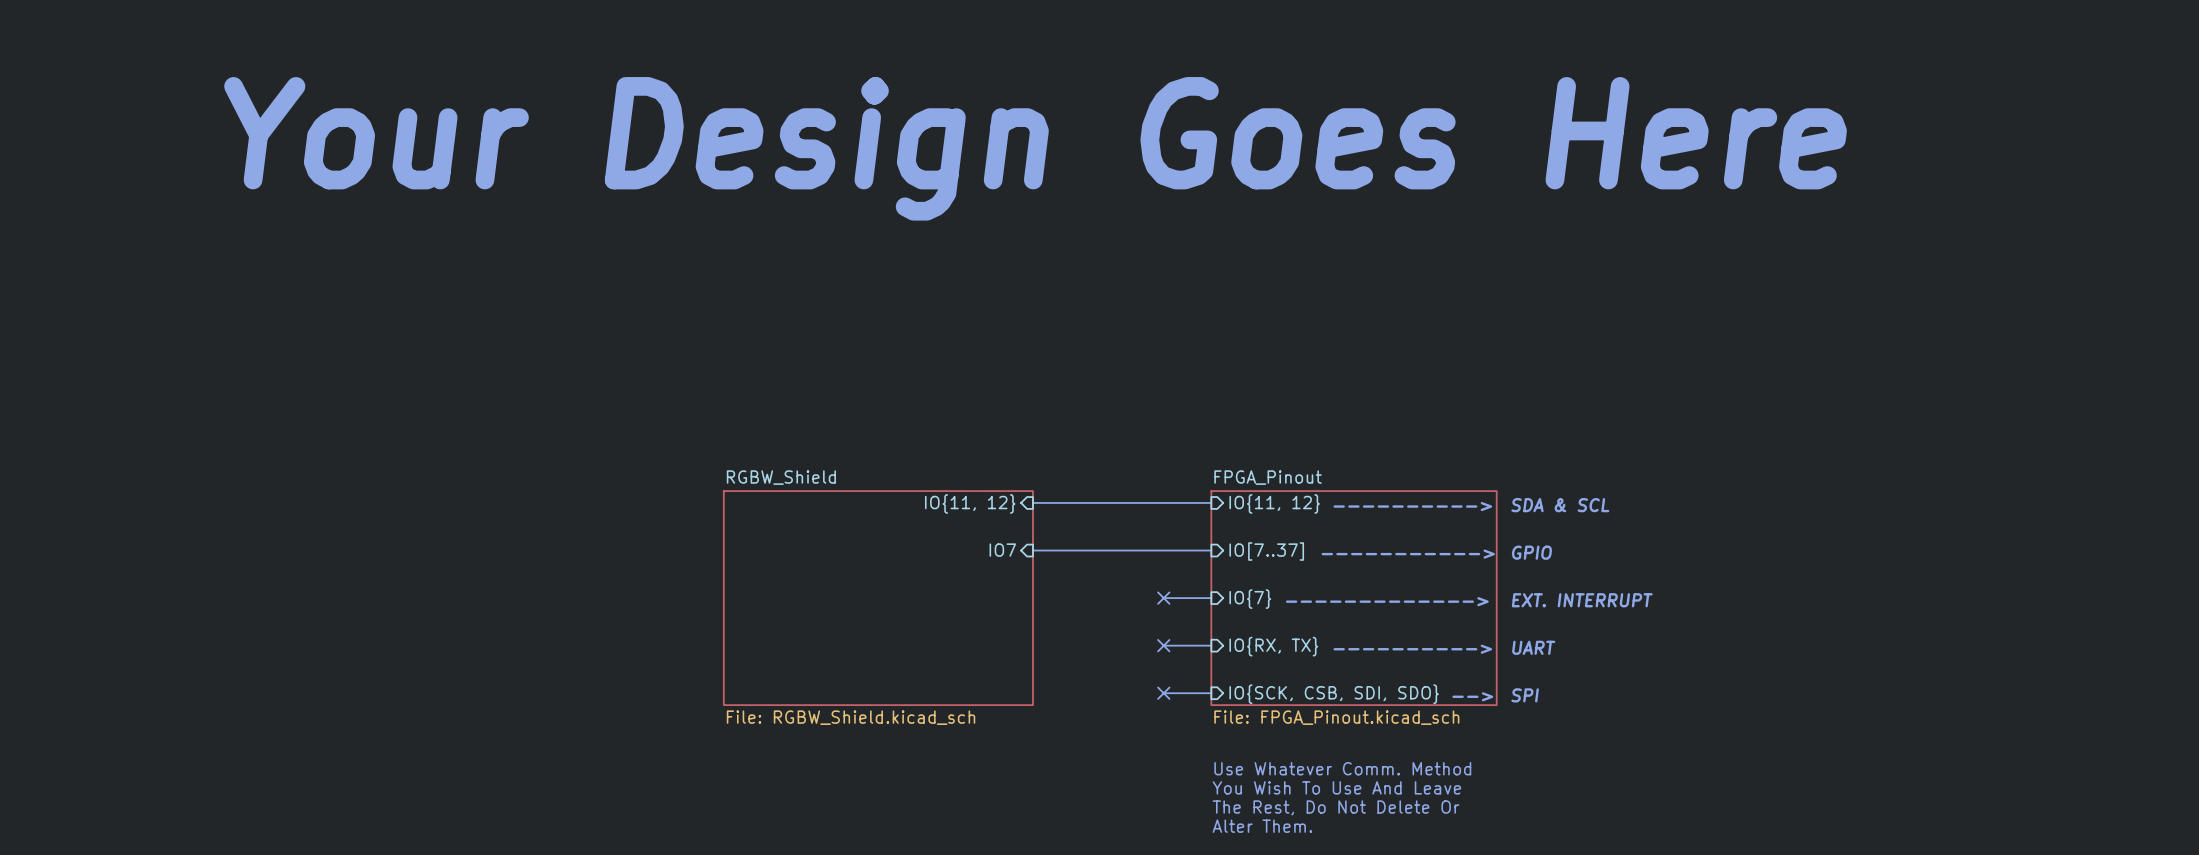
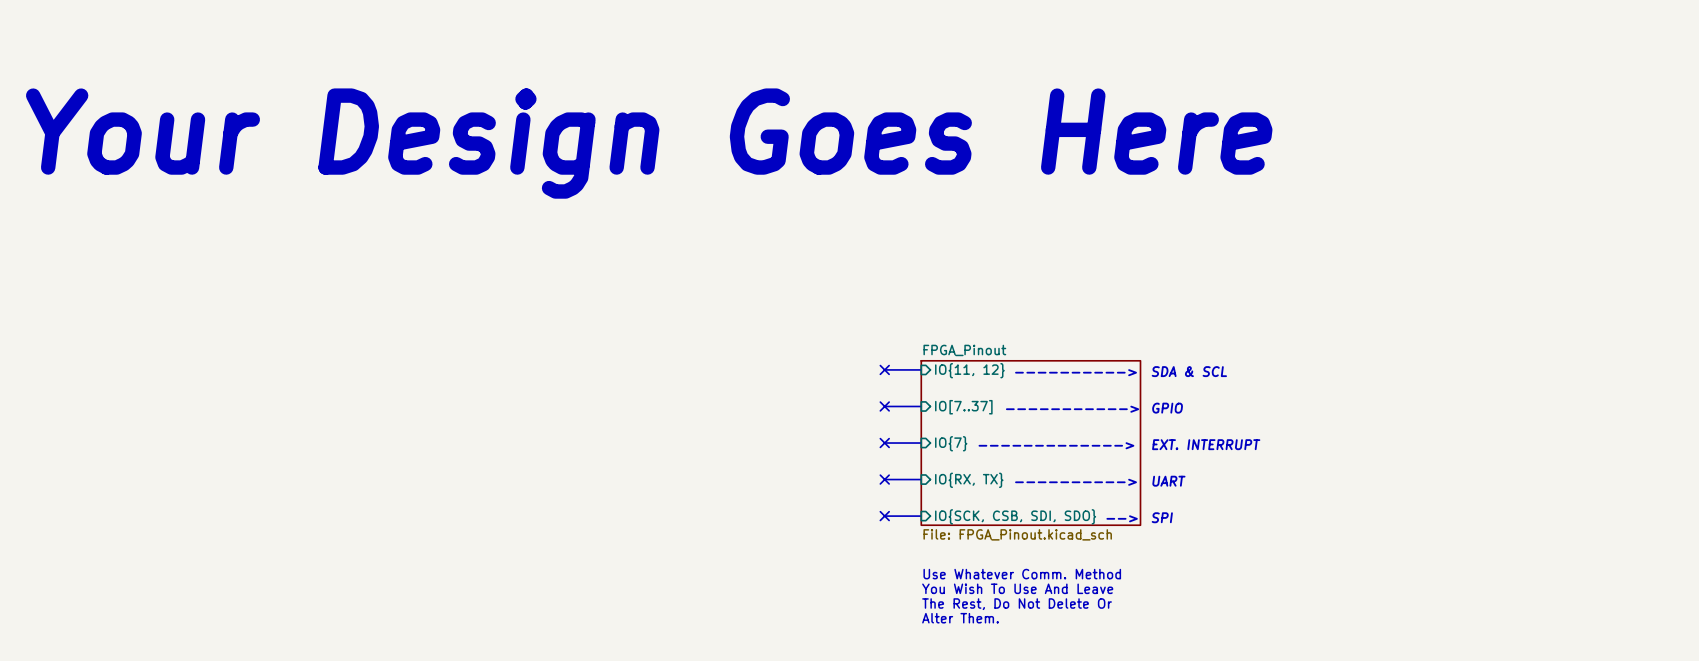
text position: Your Design Goes Here (1035, 148) -> Your Design Goes Here (649, 143)
bus: (1032, 502) (1163, 502) -> none
no-connect mark: none -> (884, 369)
sheet pin: IO{11, 12} (970, 503) -> none
sheet pin: IO7 (1002, 550) -> none
bus: (1032, 550) (1163, 550) -> none
no-connect mark: none -> (884, 406)
sheet RGBW_Shield: File: RGBW_Shield.kicad_sch (878, 598) -> none

